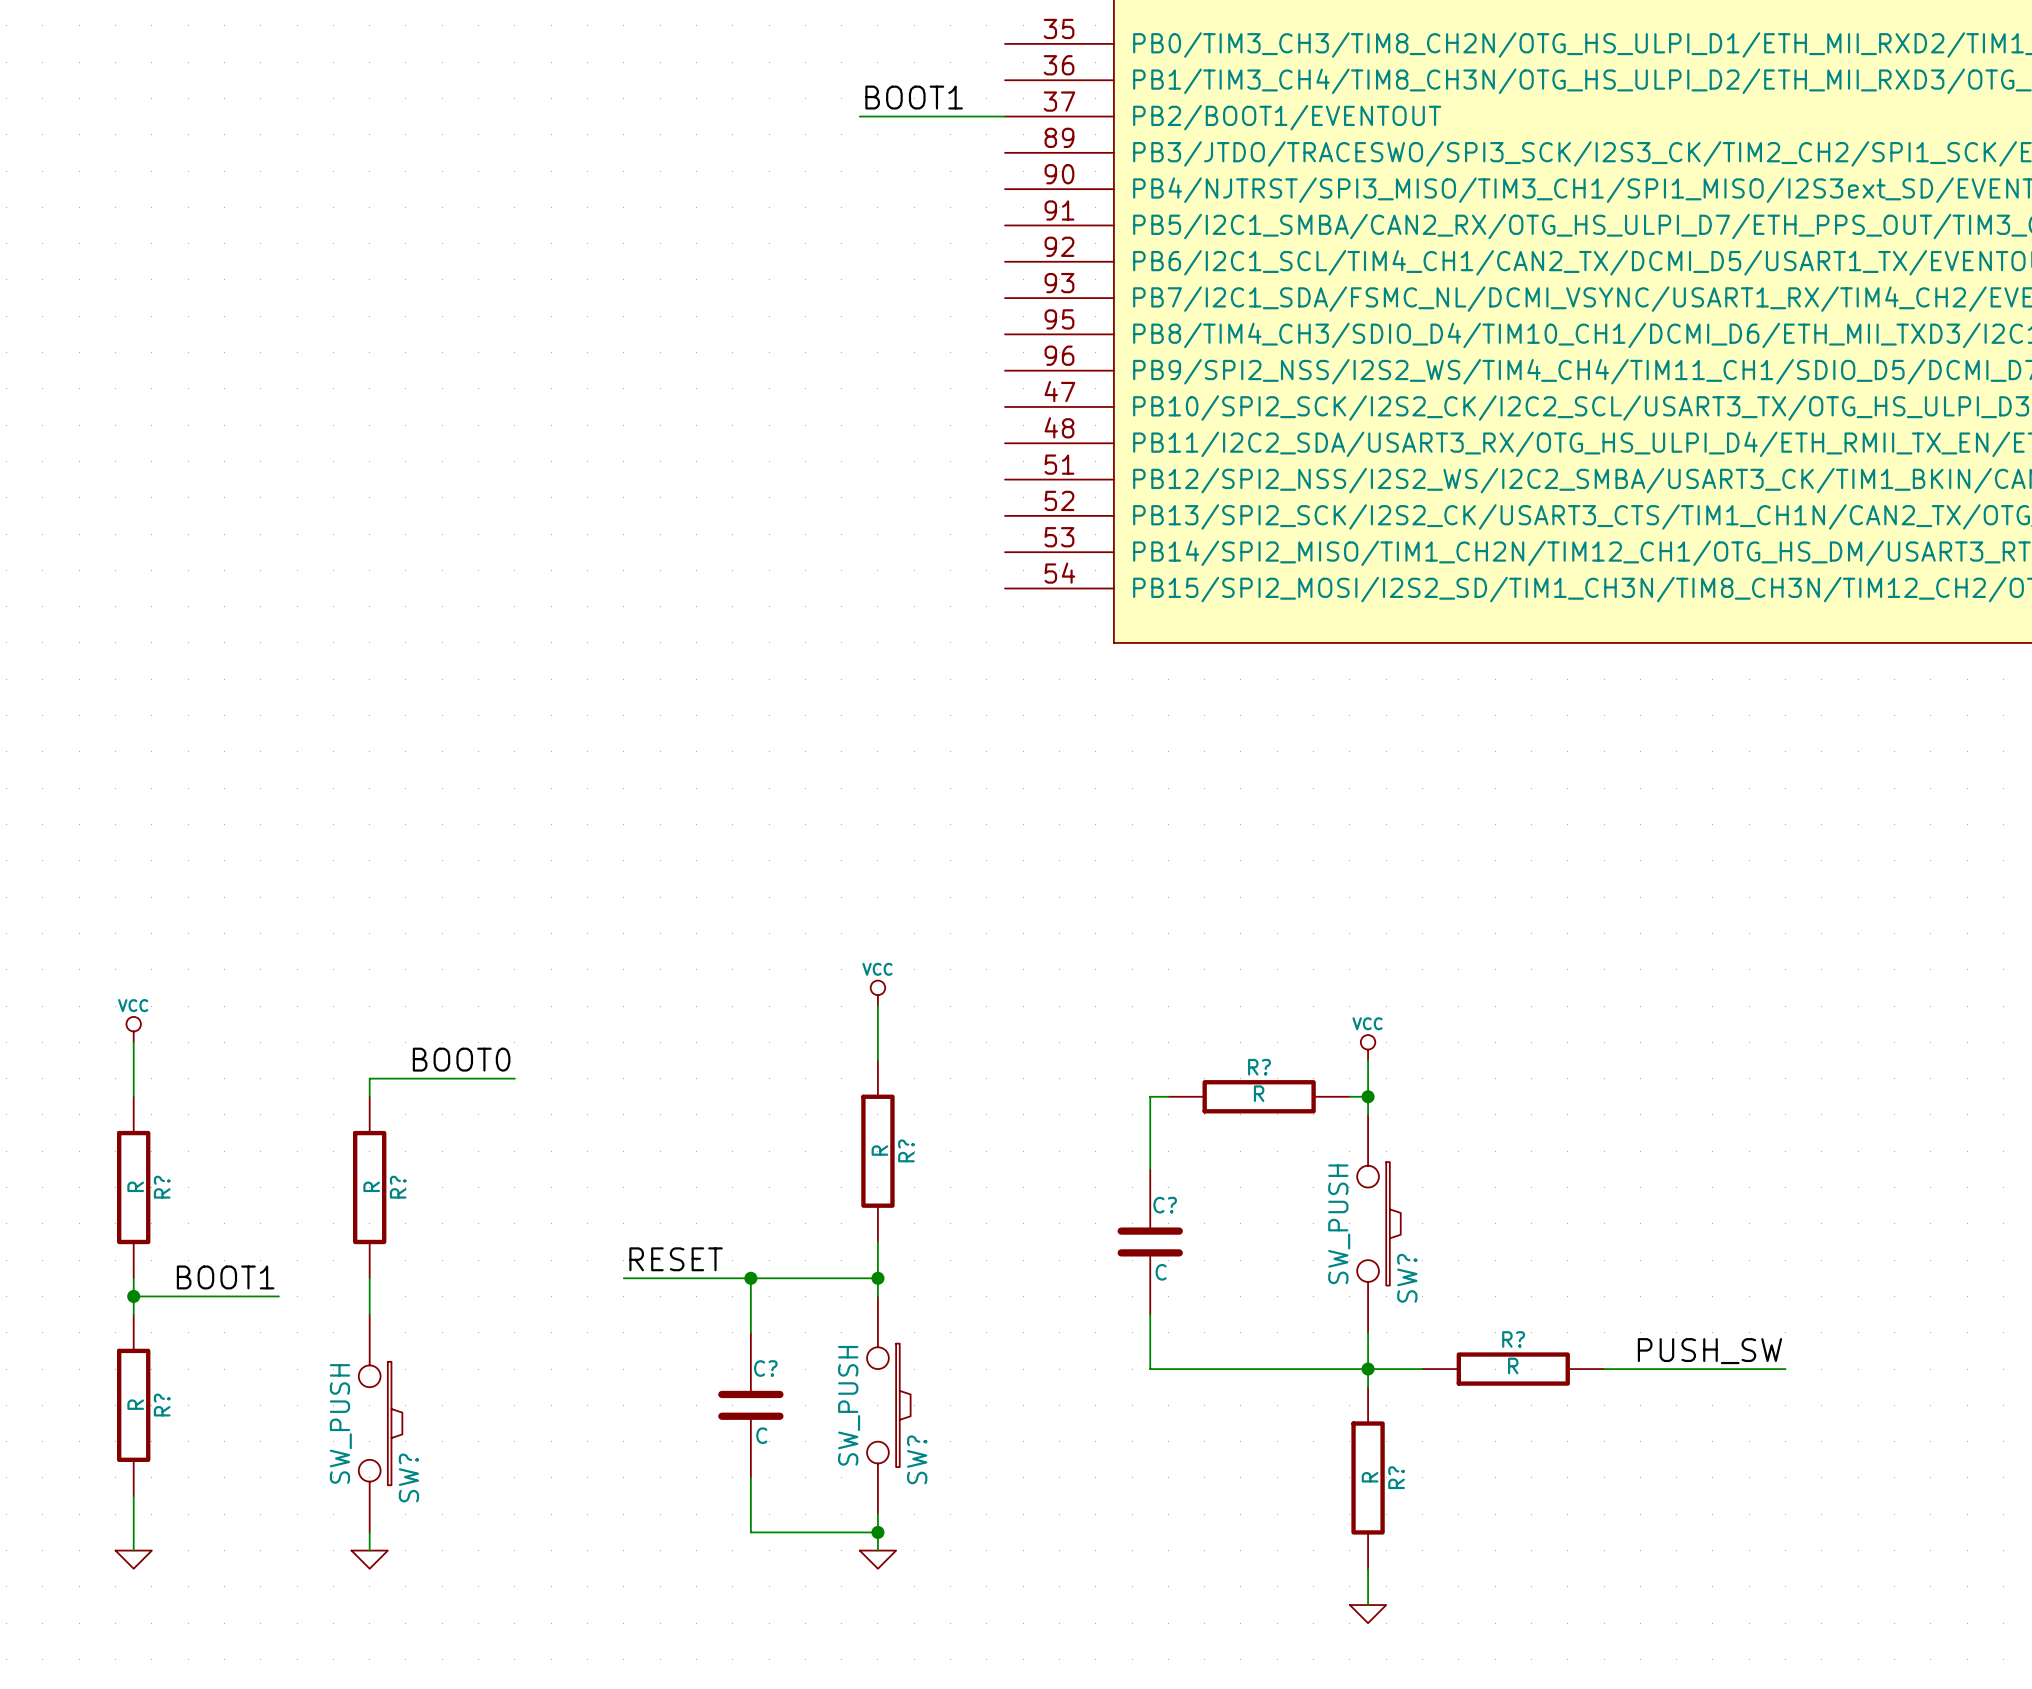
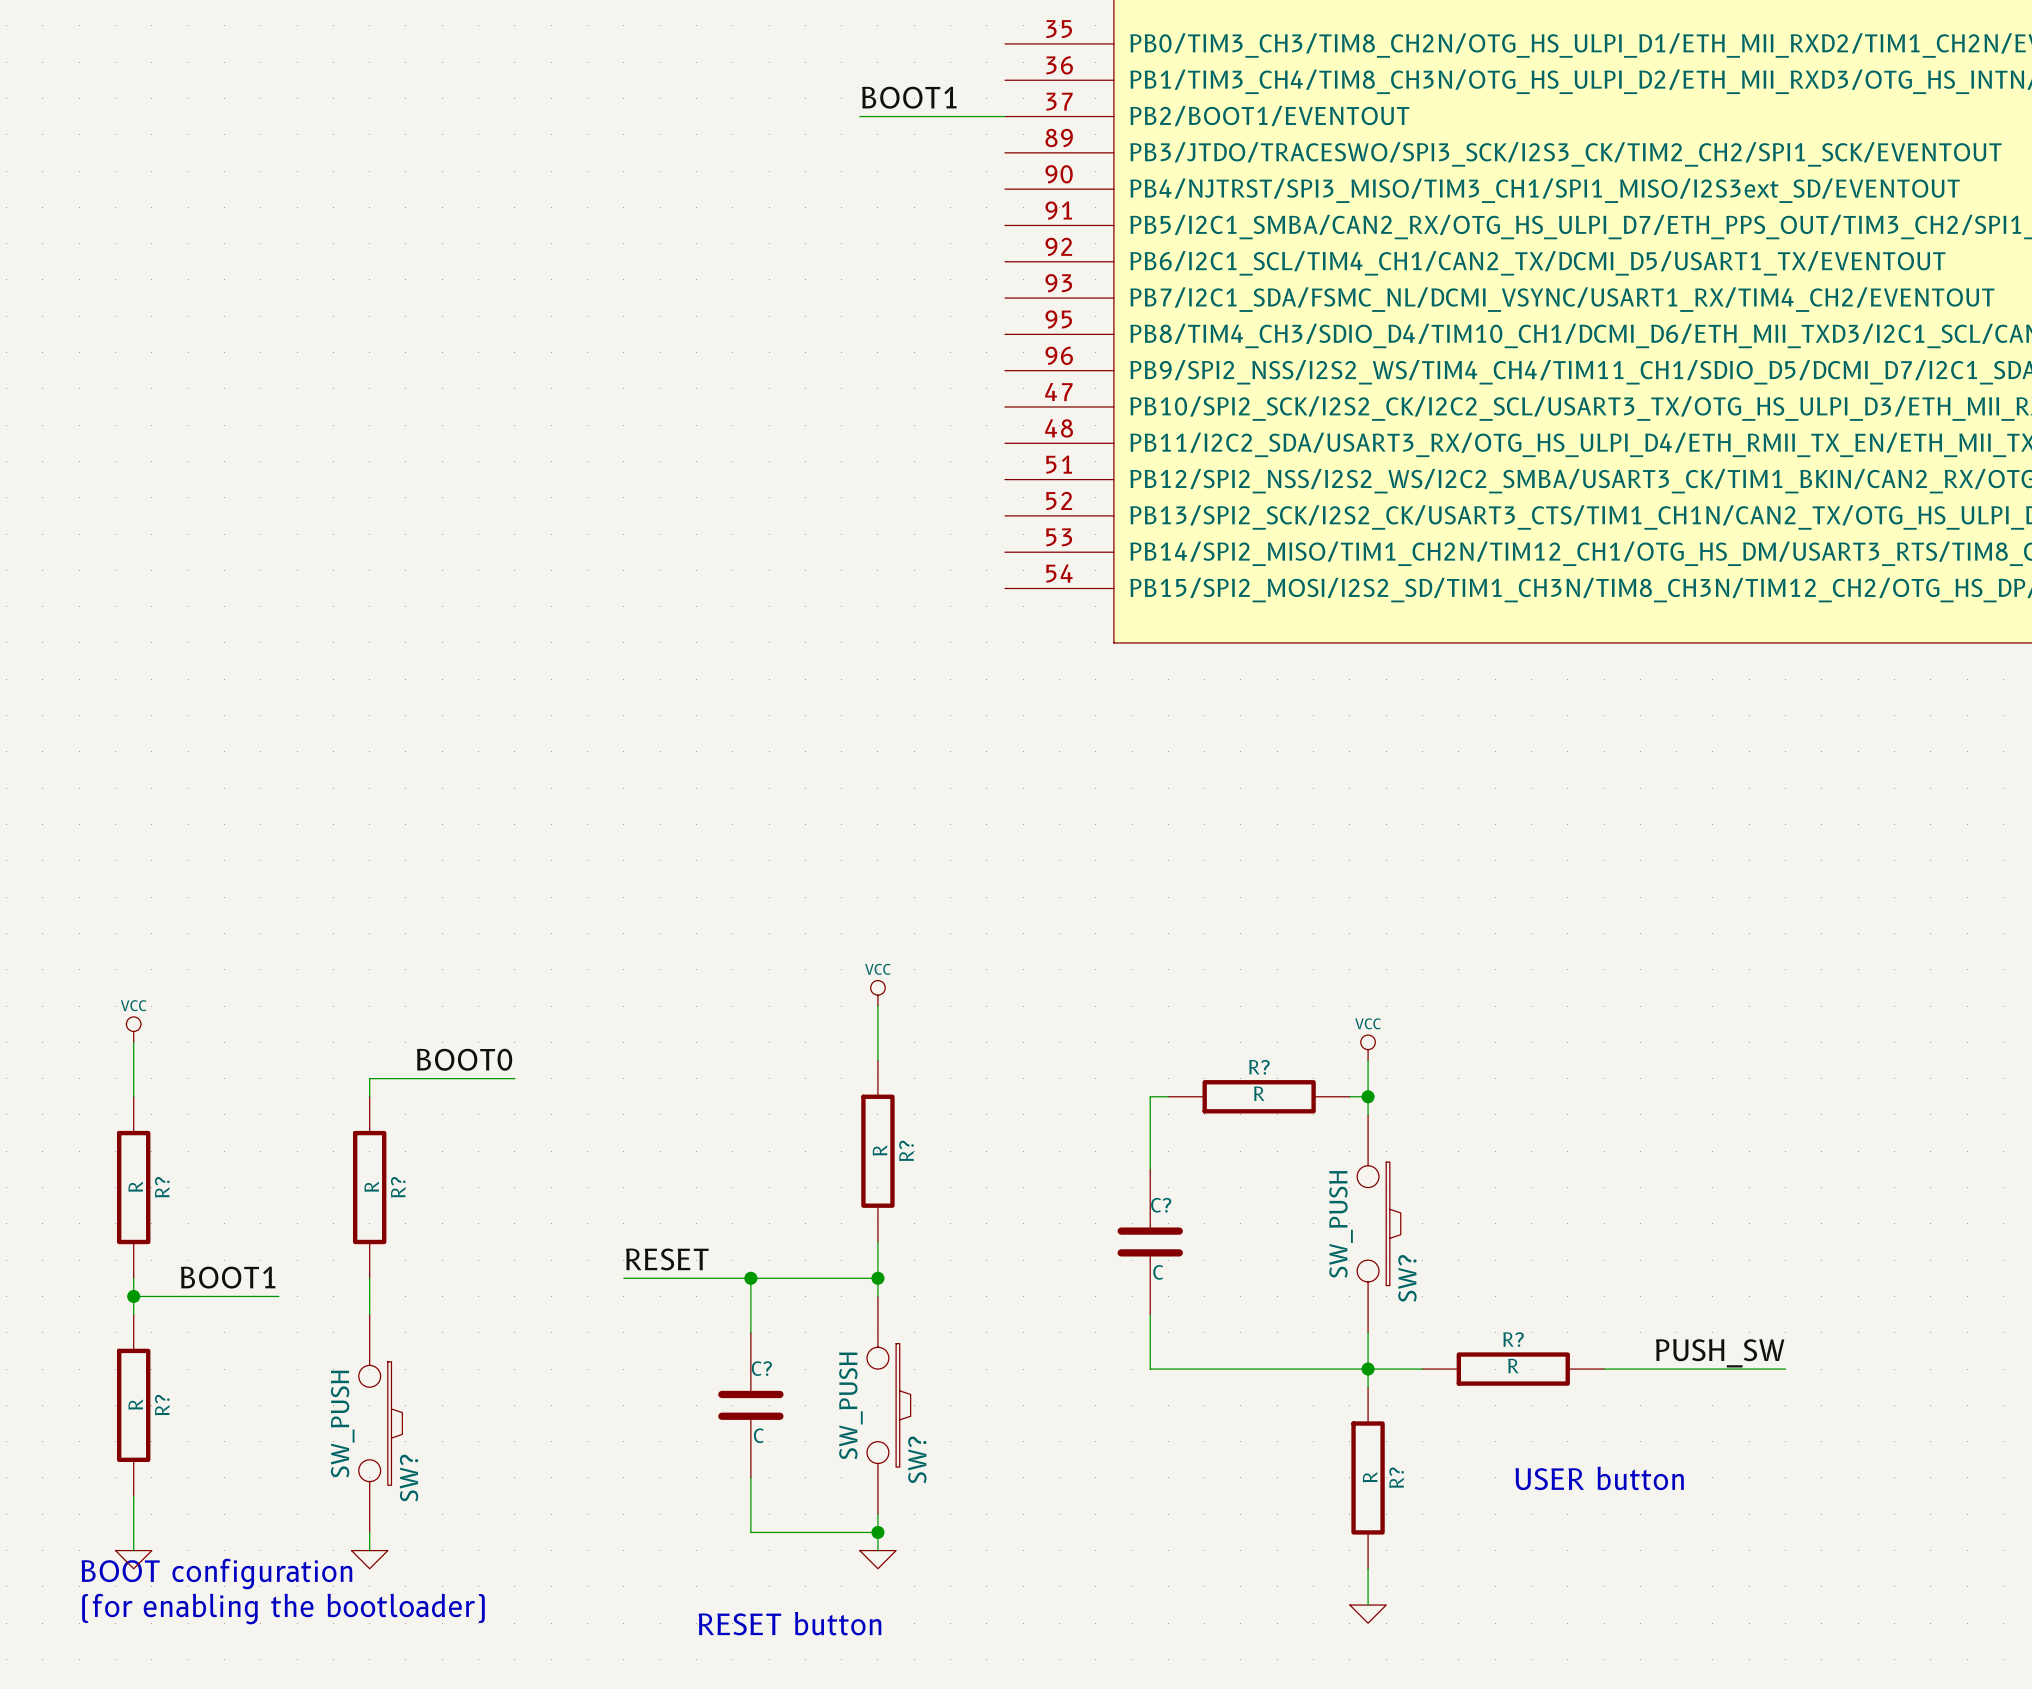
text: none -> USER button (1599, 1478)
text: none -> BOOT configuration (216, 1574)
text: none -> (for enabling the bootloader) (283, 1609)
text: none -> RESET button (789, 1623)

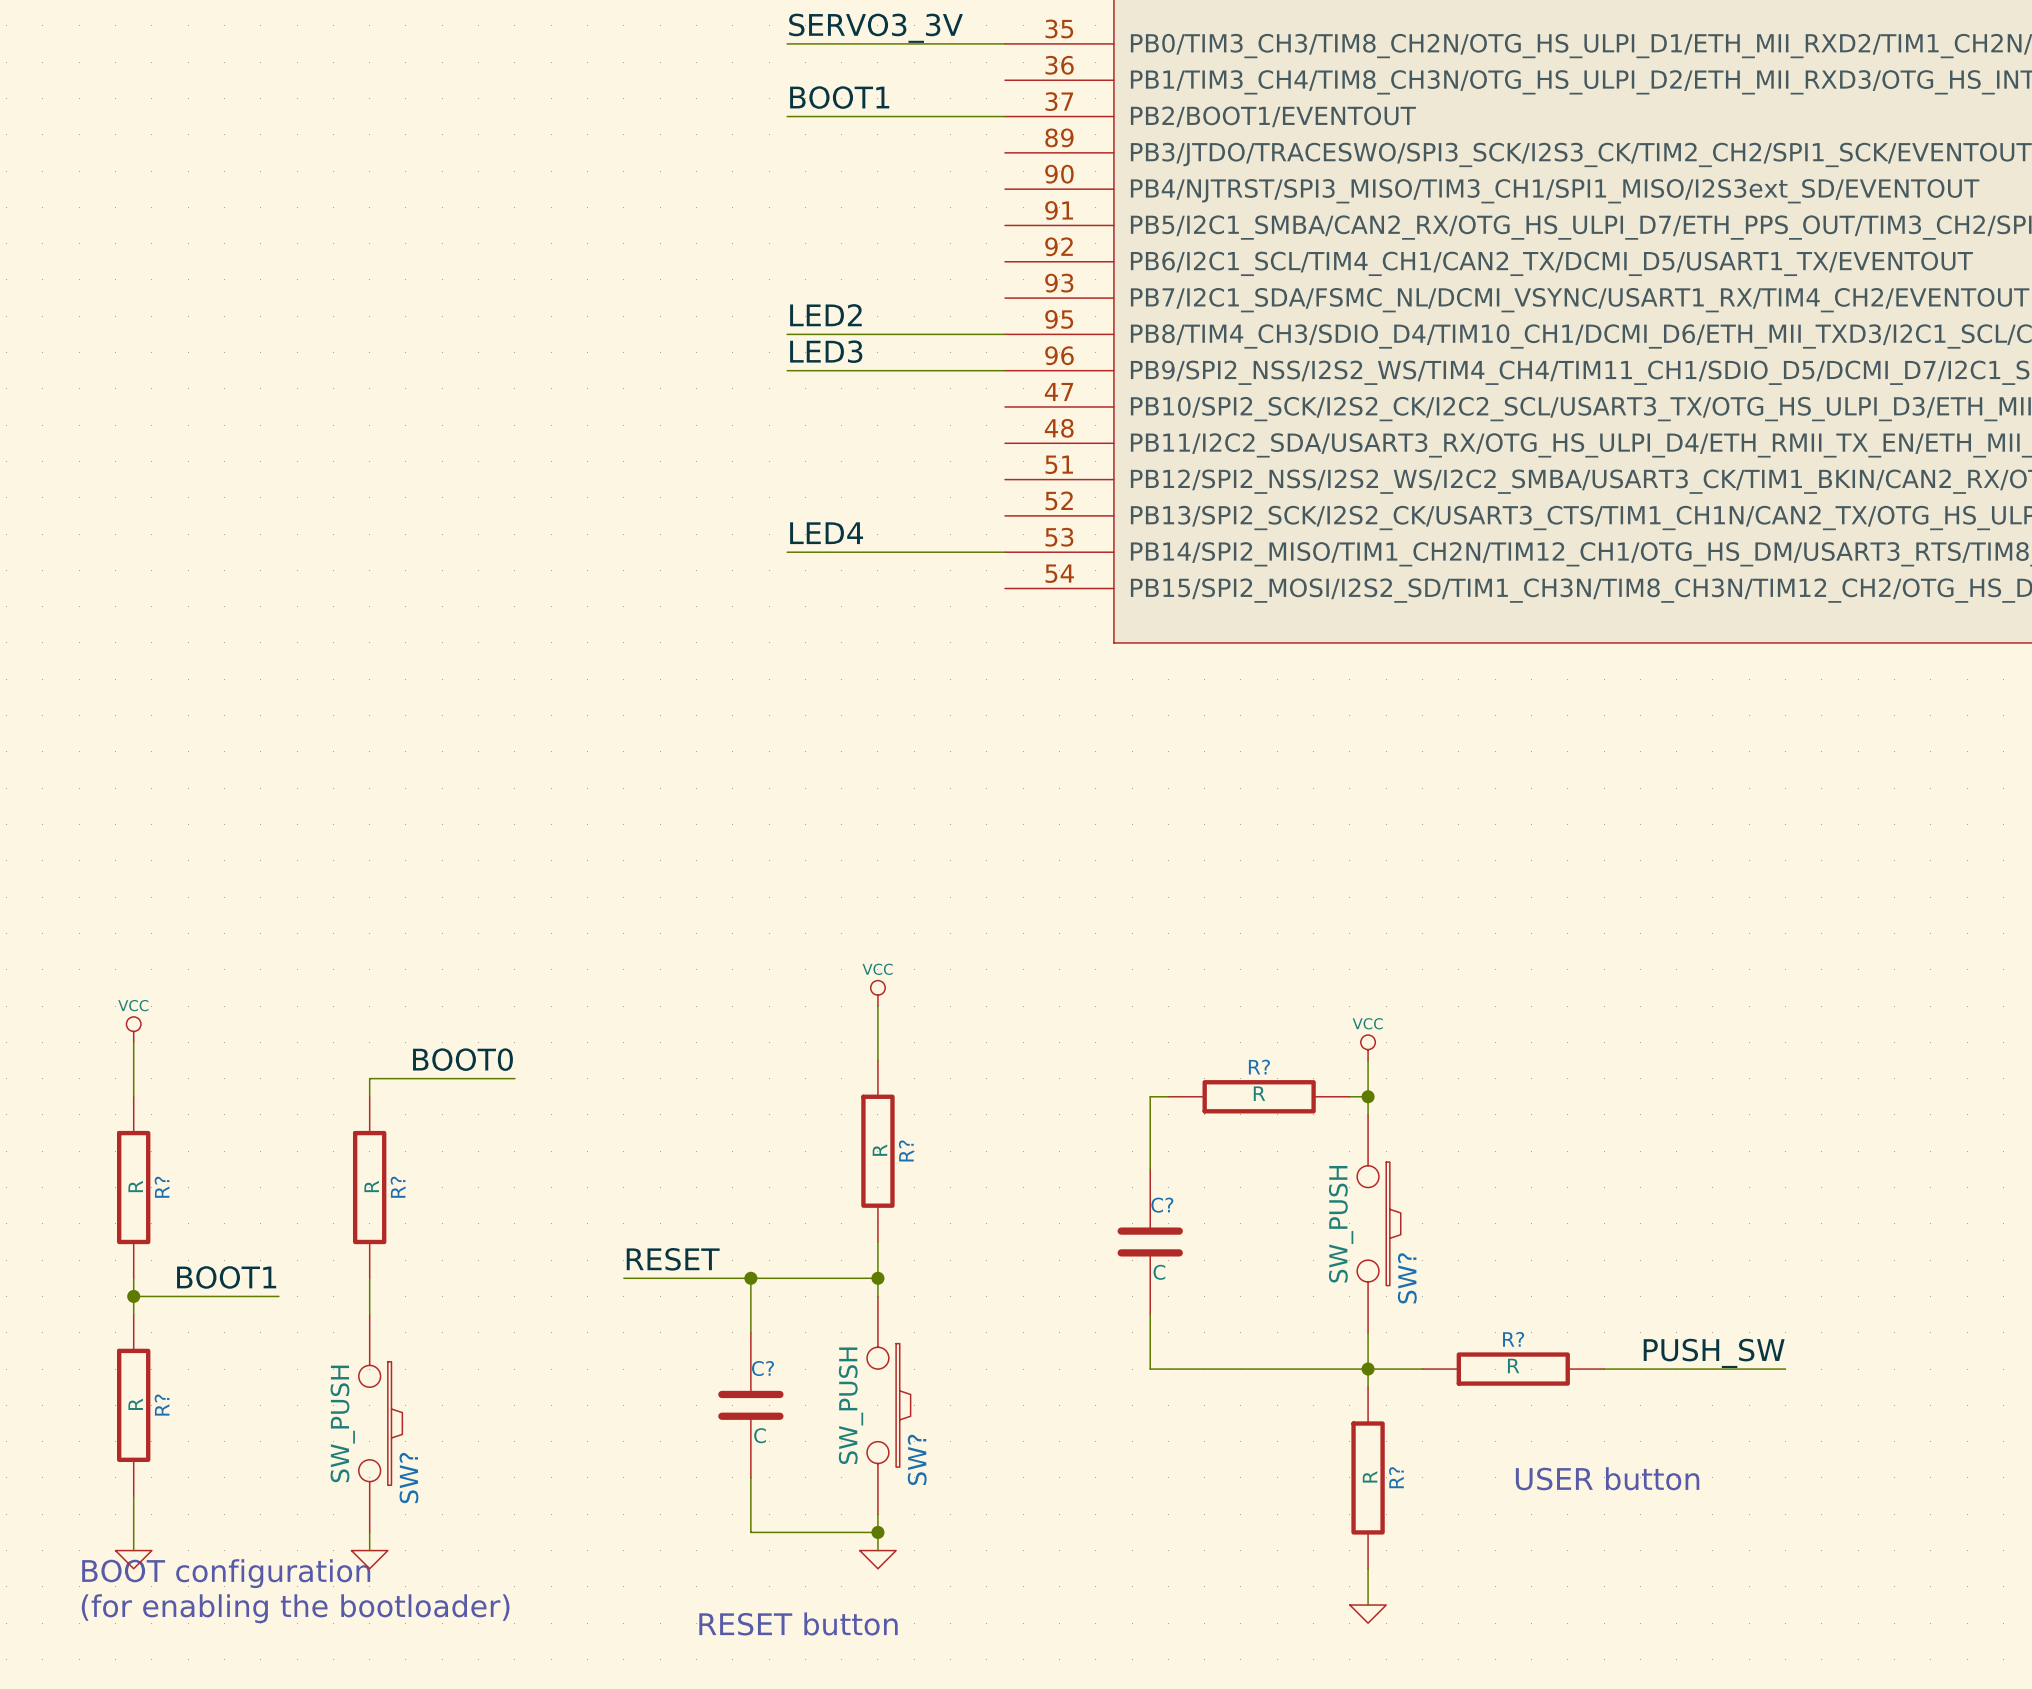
label: none -> SERVO3_3V (876, 28)
wire: none -> (787, 43) (1005, 43)
label position: BOOT1 (909, 97) -> BOOT1 (839, 97)
wire: none -> (787, 116) (859, 116)
label: none -> LED2 (825, 315)
wire: none -> (787, 334) (1005, 334)
label: none -> LED3 (826, 351)
wire: none -> (787, 370) (1005, 370)
label: none -> LED4 (826, 533)
wire: none -> (787, 552) (1005, 552)

